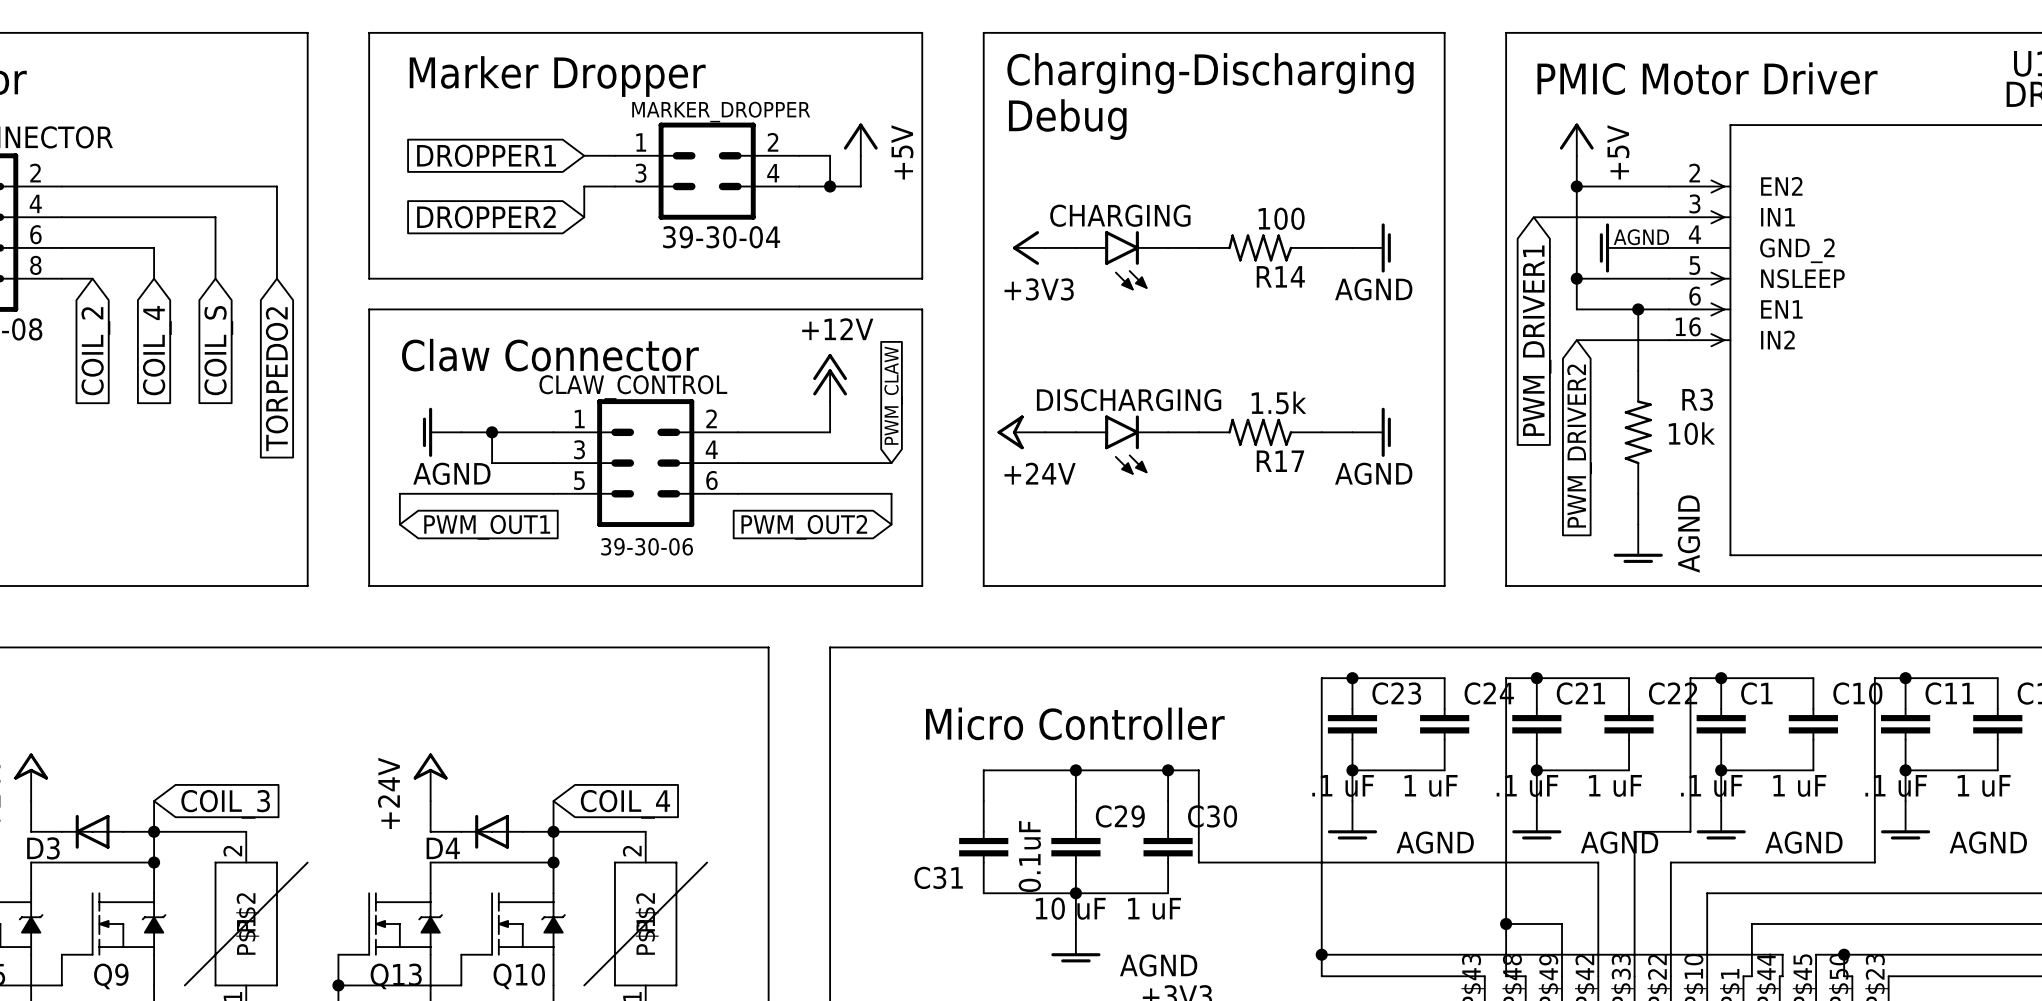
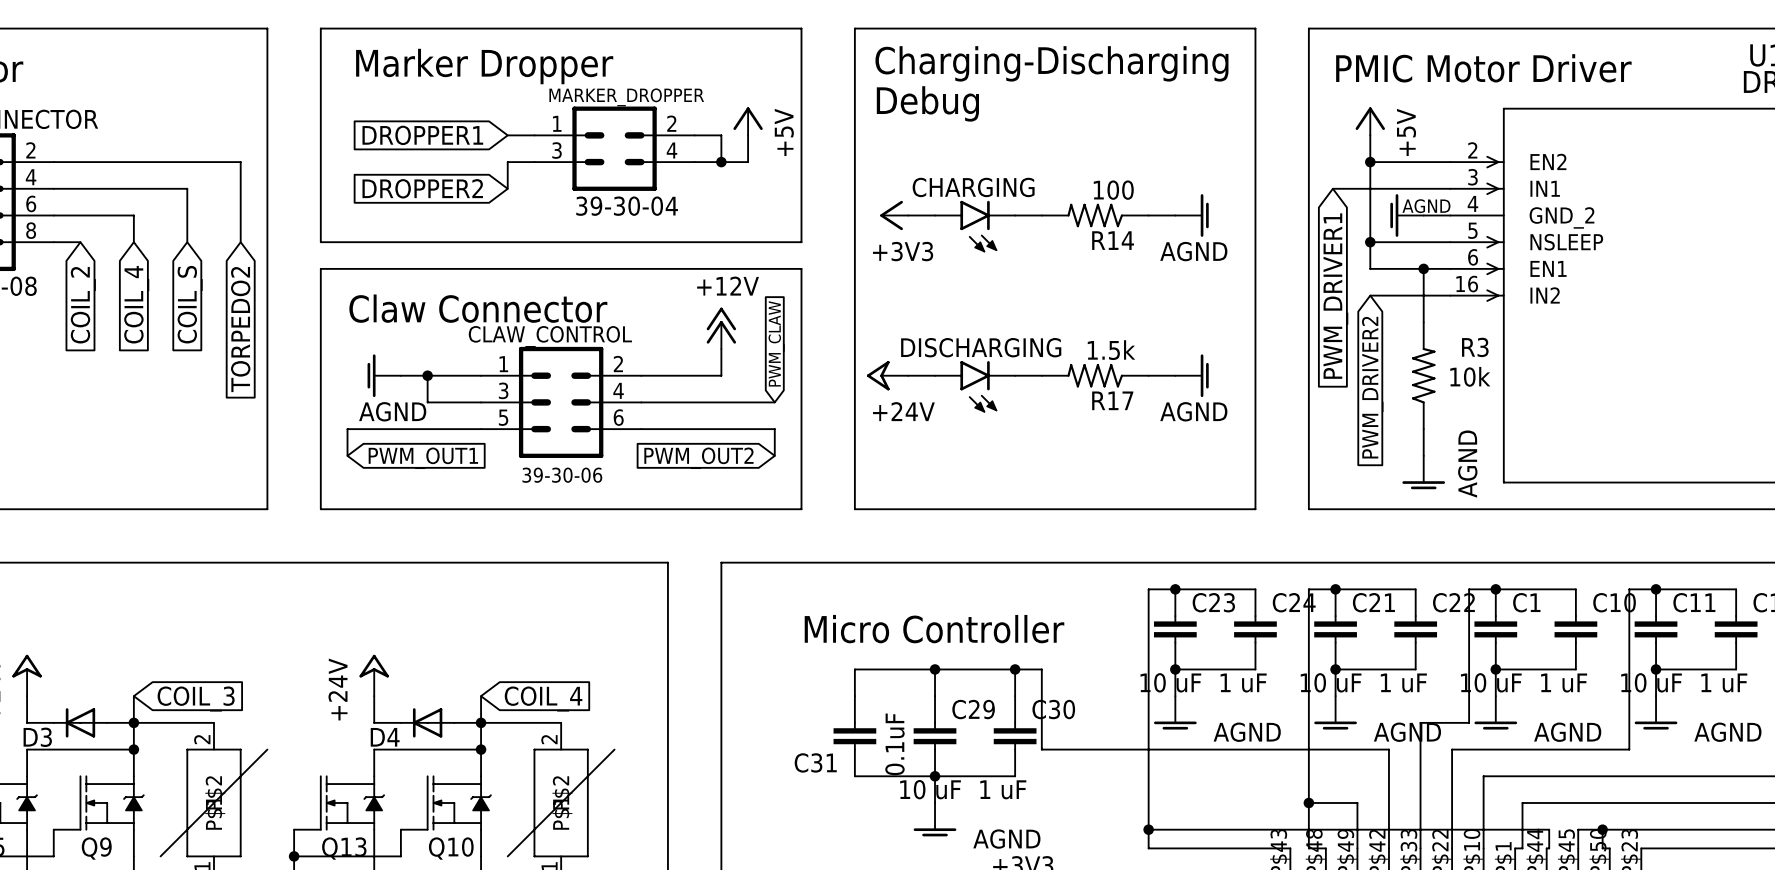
C23 value: .1 uF (1343, 785) -> 10 uF (1170, 682)
C21 value: .1 uF (1527, 785) -> 10 uF (1331, 682)
C1 value: .1 uF (1711, 785) -> 10 uF (1491, 682)
C11 value: .1 uF (1896, 785) -> 10 uF (1651, 682)

